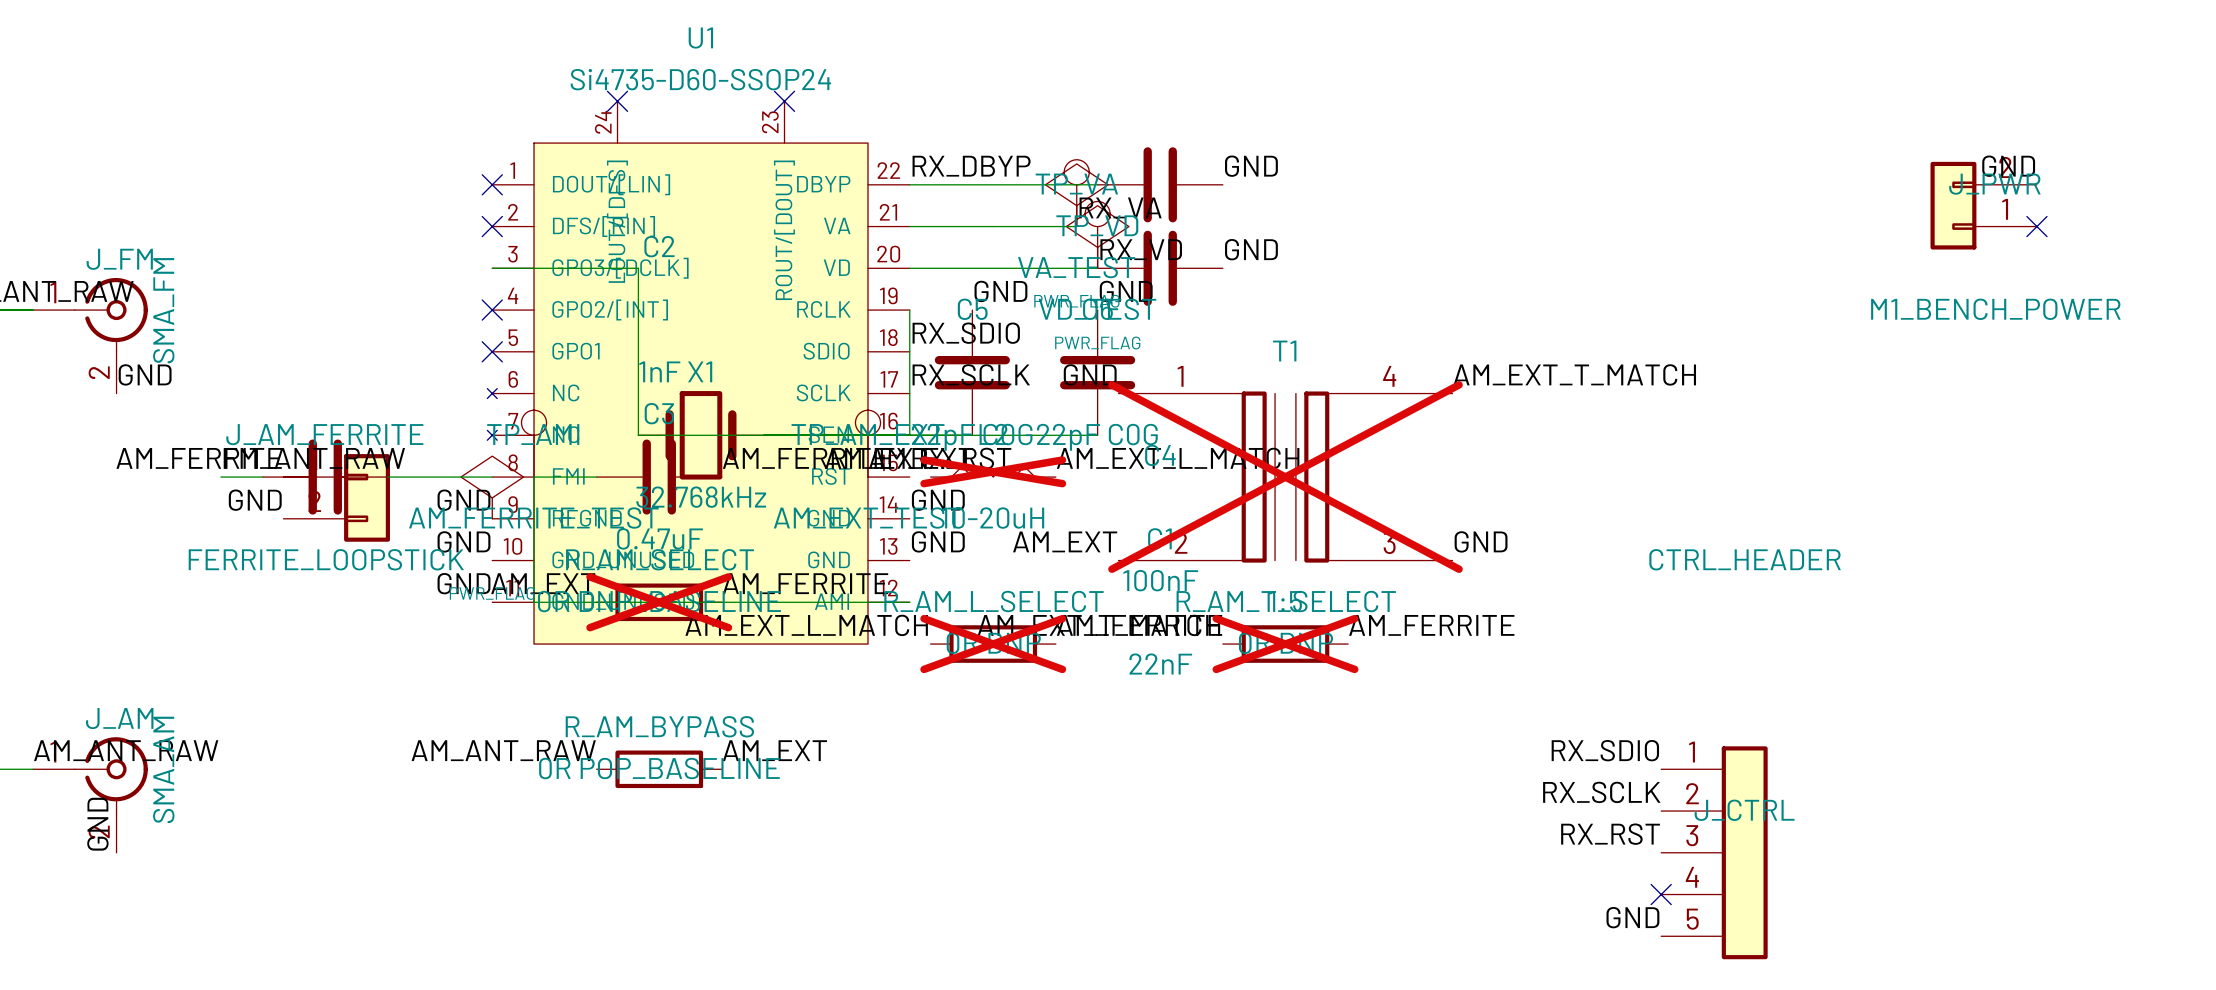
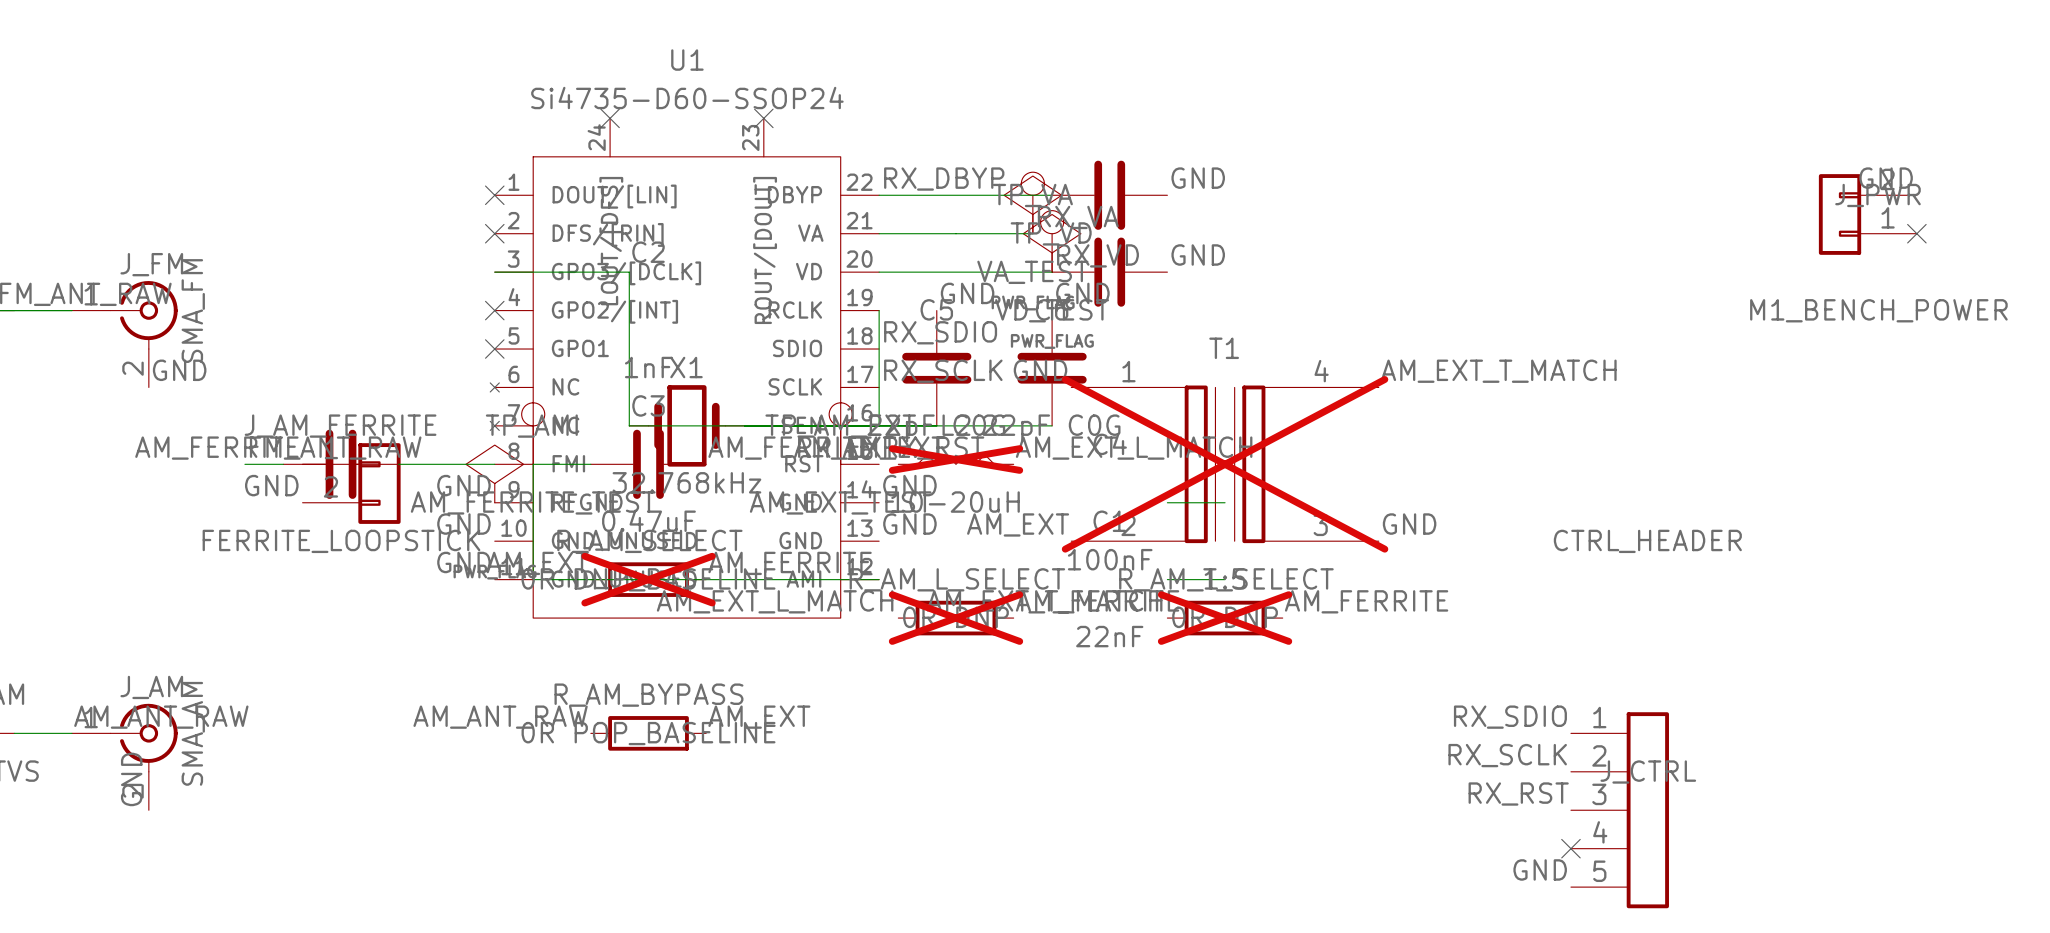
wire: none -> (1167, 502) (1225, 502)
wire: none -> (1167, 579) (1225, 579)

